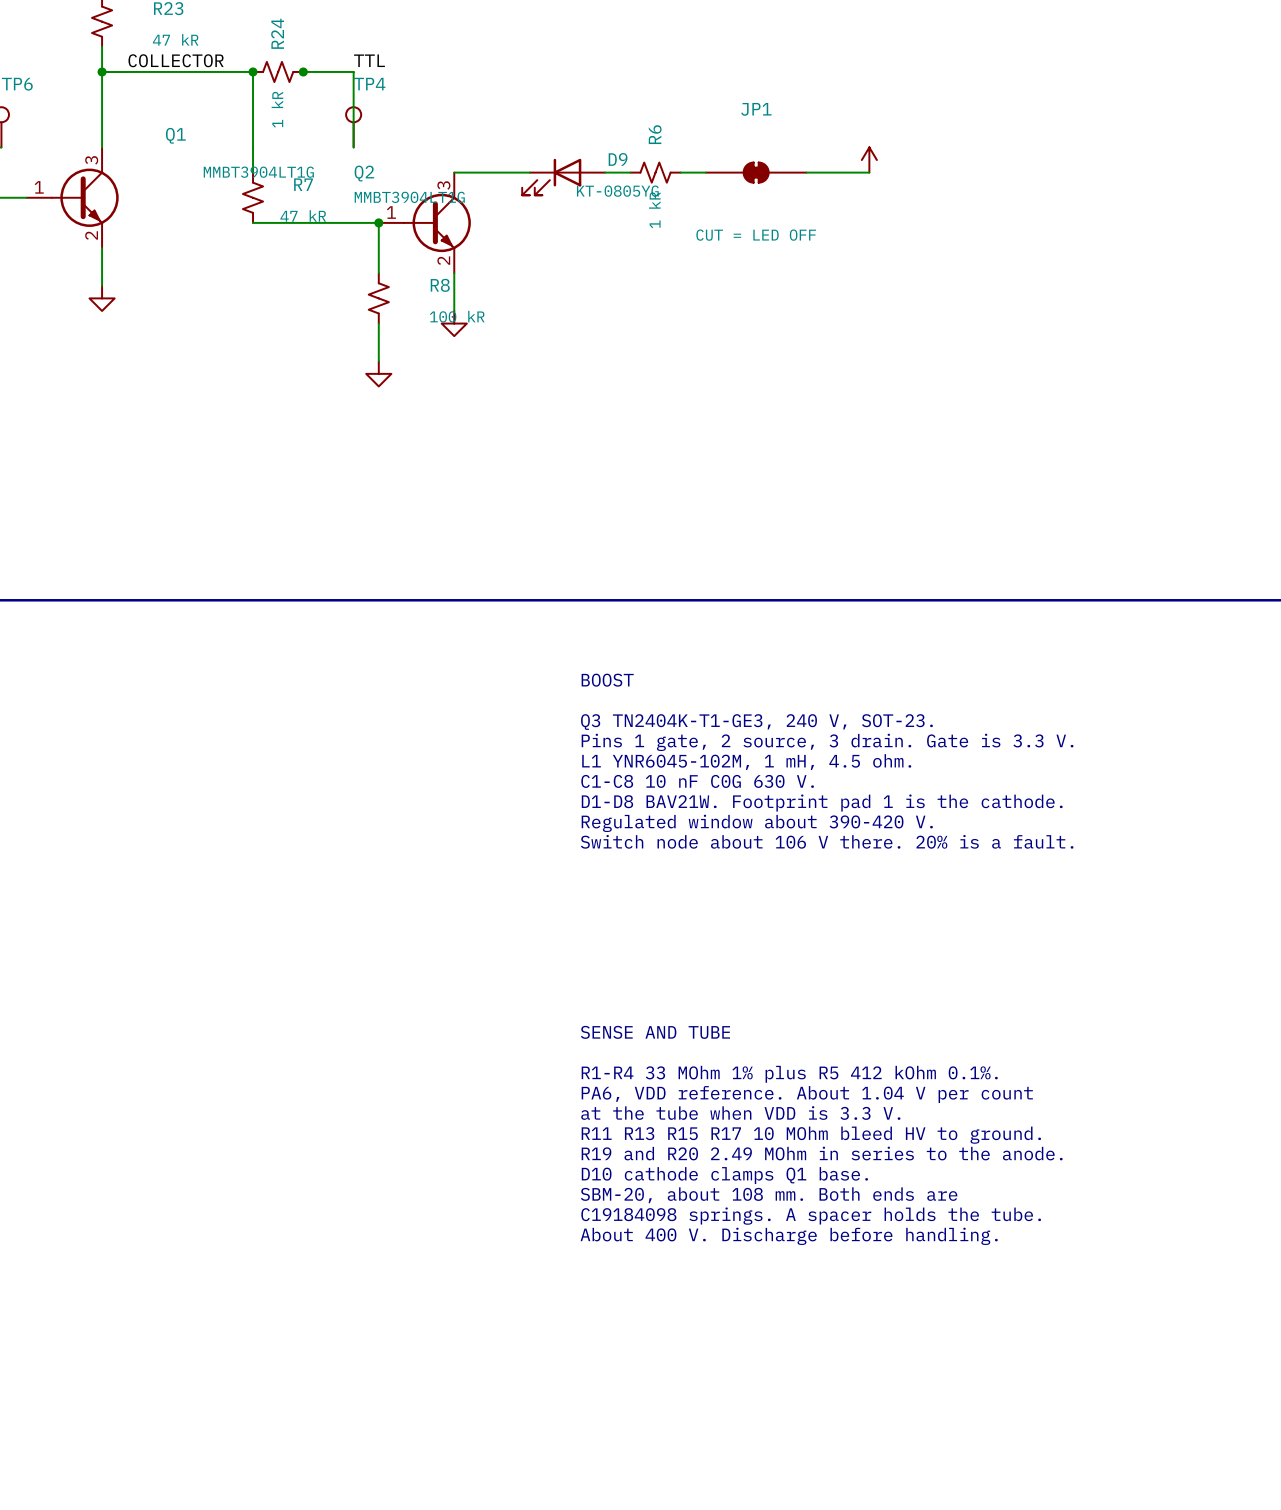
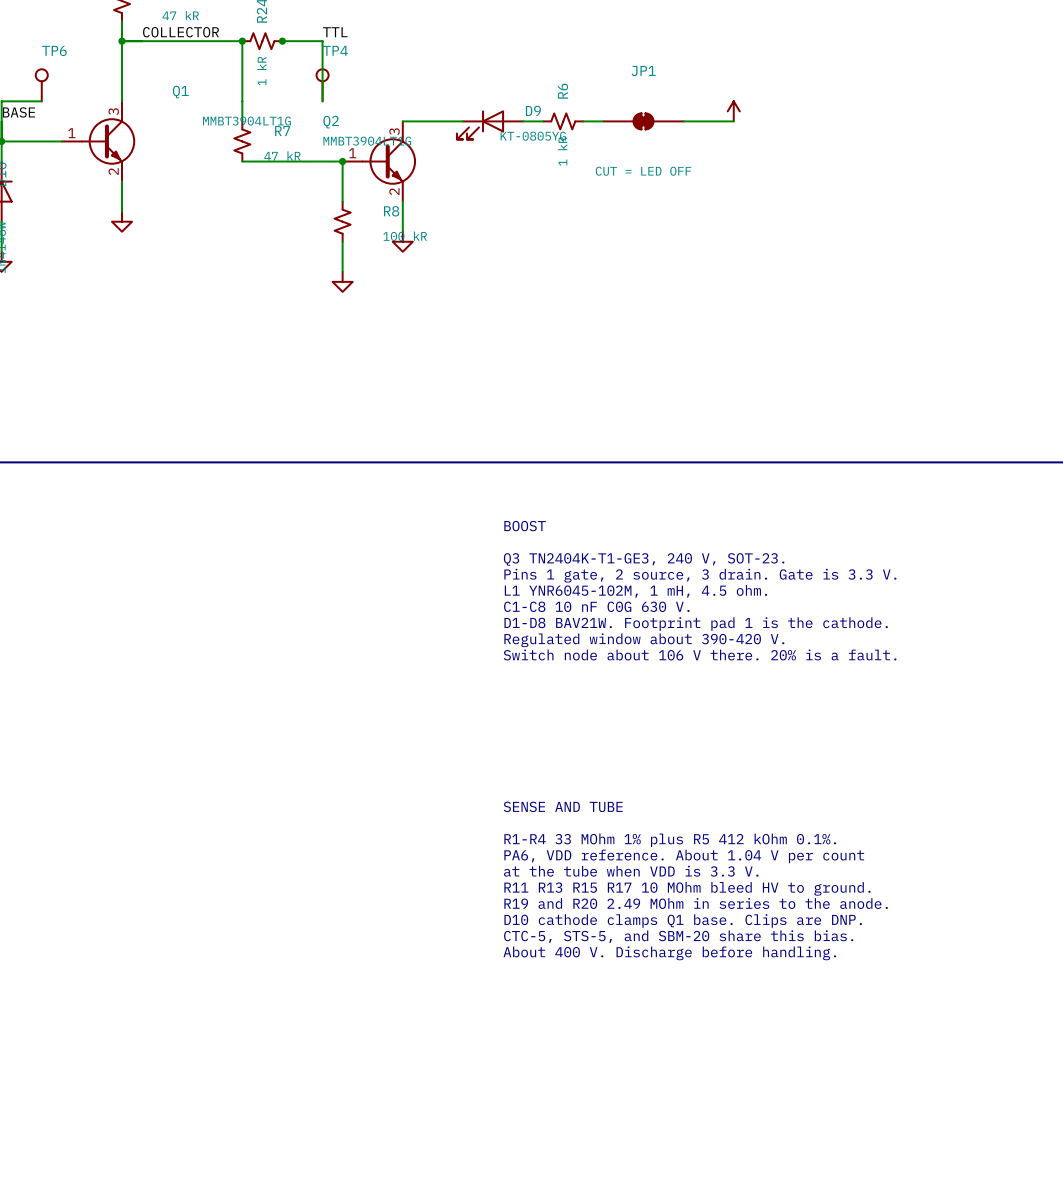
text: D10 cathode clamps Q1 base. (724, 1175) -> D10 cathode clamps Q1 base. Clips are DNP. (683, 920)
text: SBM-20, about 108 mm. Both ends are (769, 1195) -> CTC-5, STS-5, and SBM-20 share this bias. (678, 936)
text: C19184098 springs. A spacer holds the tube. (811, 1216) -> About 400 V. Discharge before handling. (669, 953)
text: About 400 V. Discharge before handling. (789, 1236) -> none

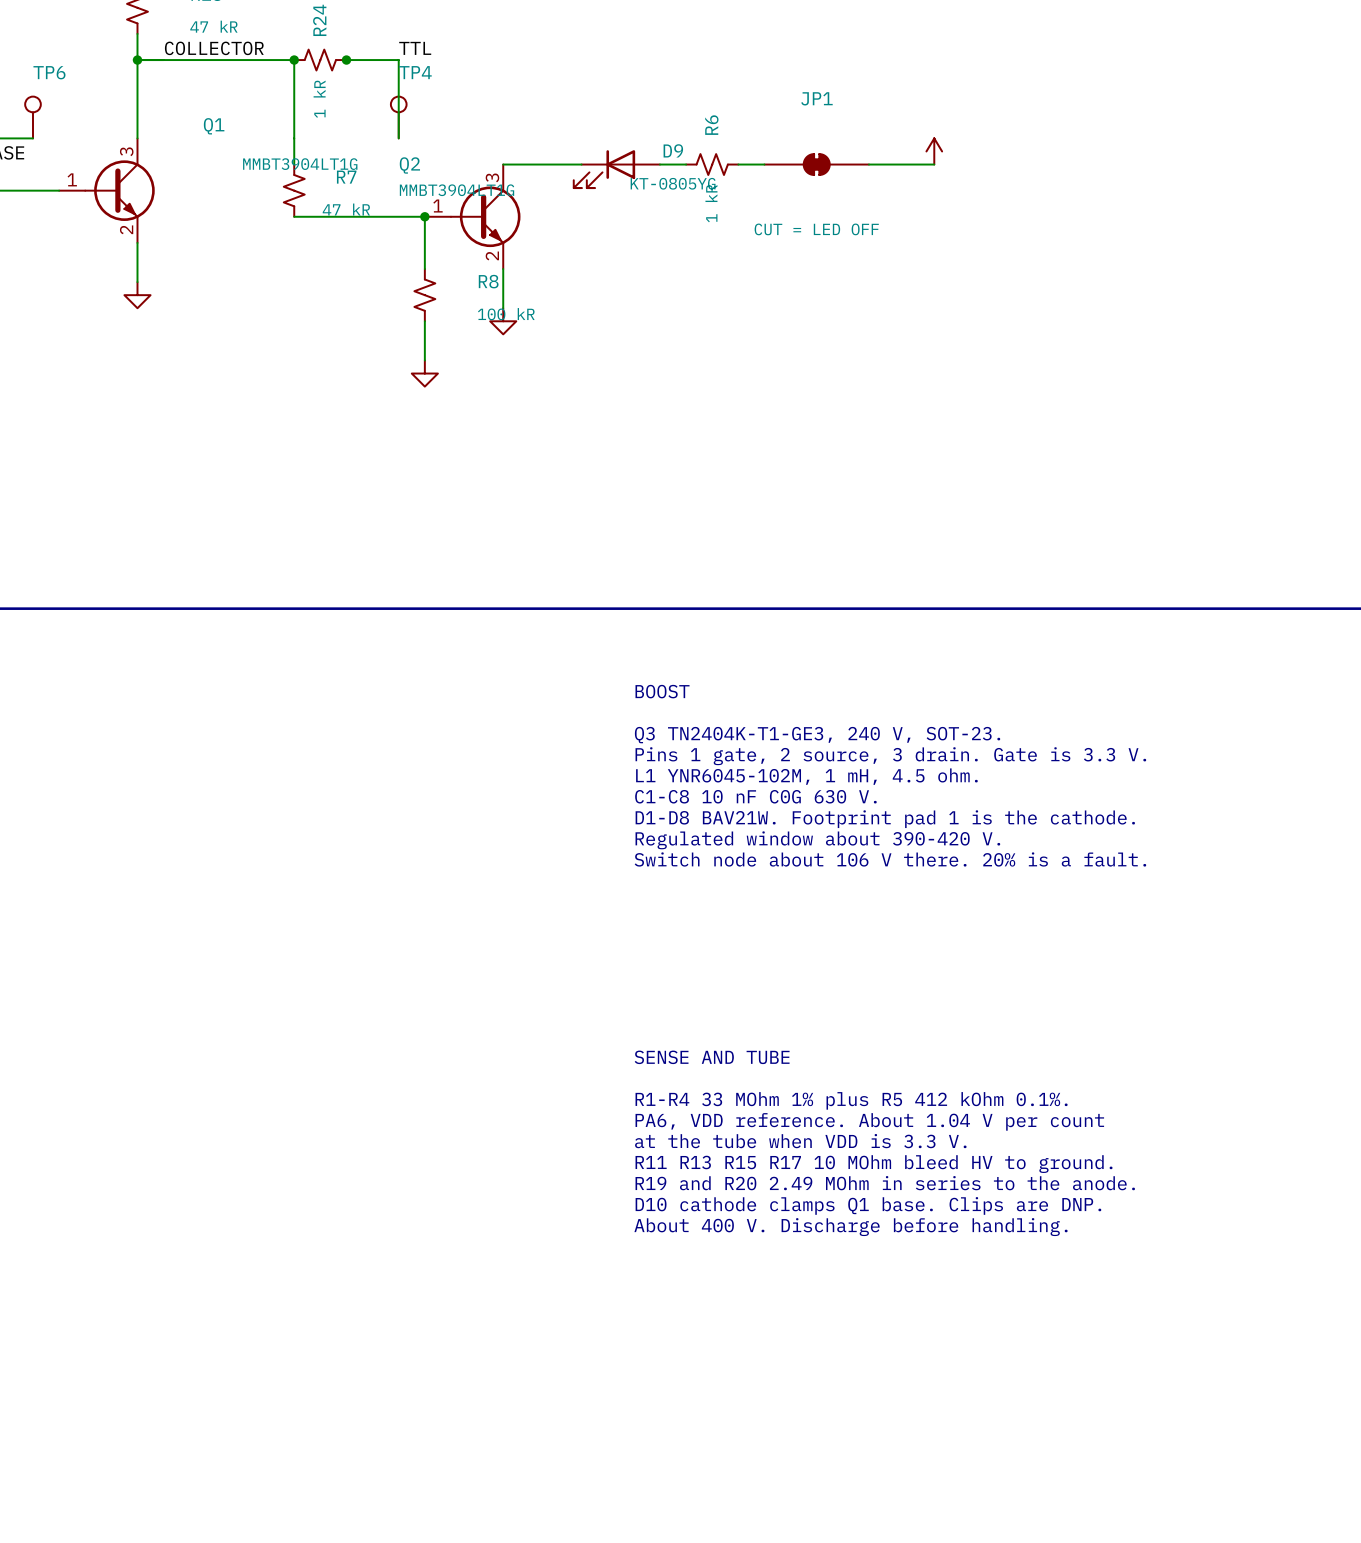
text: CTC-5, STS-5, and SBM-20 share this bias. (678, 936) -> About 400 V. Discharge before handling. (850, 1227)
text: About 400 V. Discharge before handling. (669, 953) -> none

